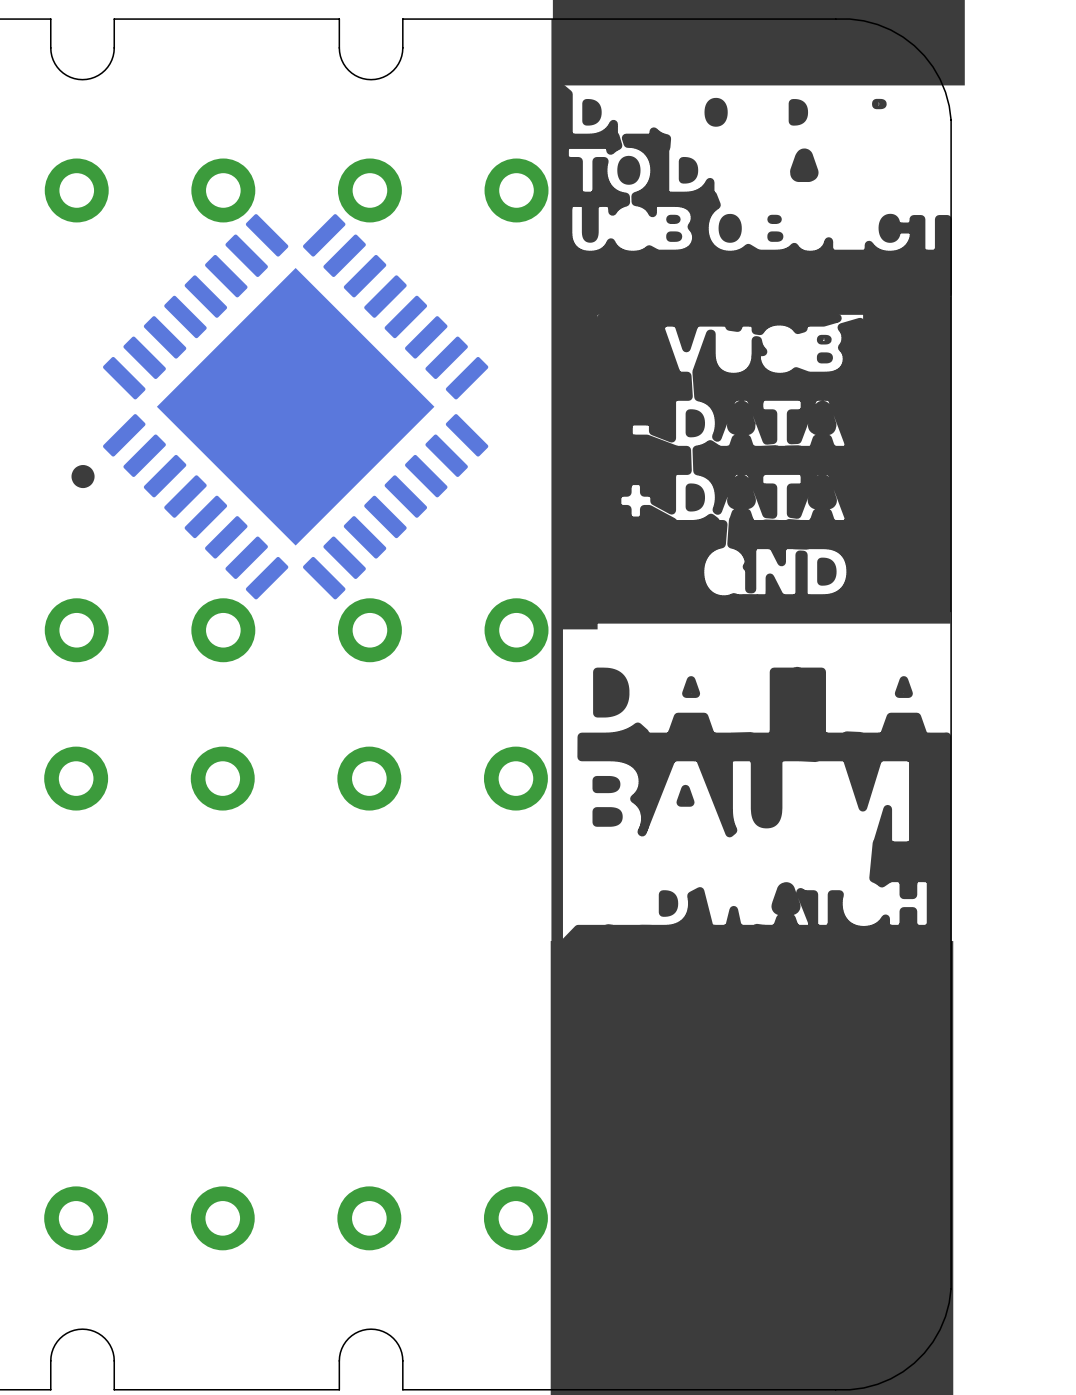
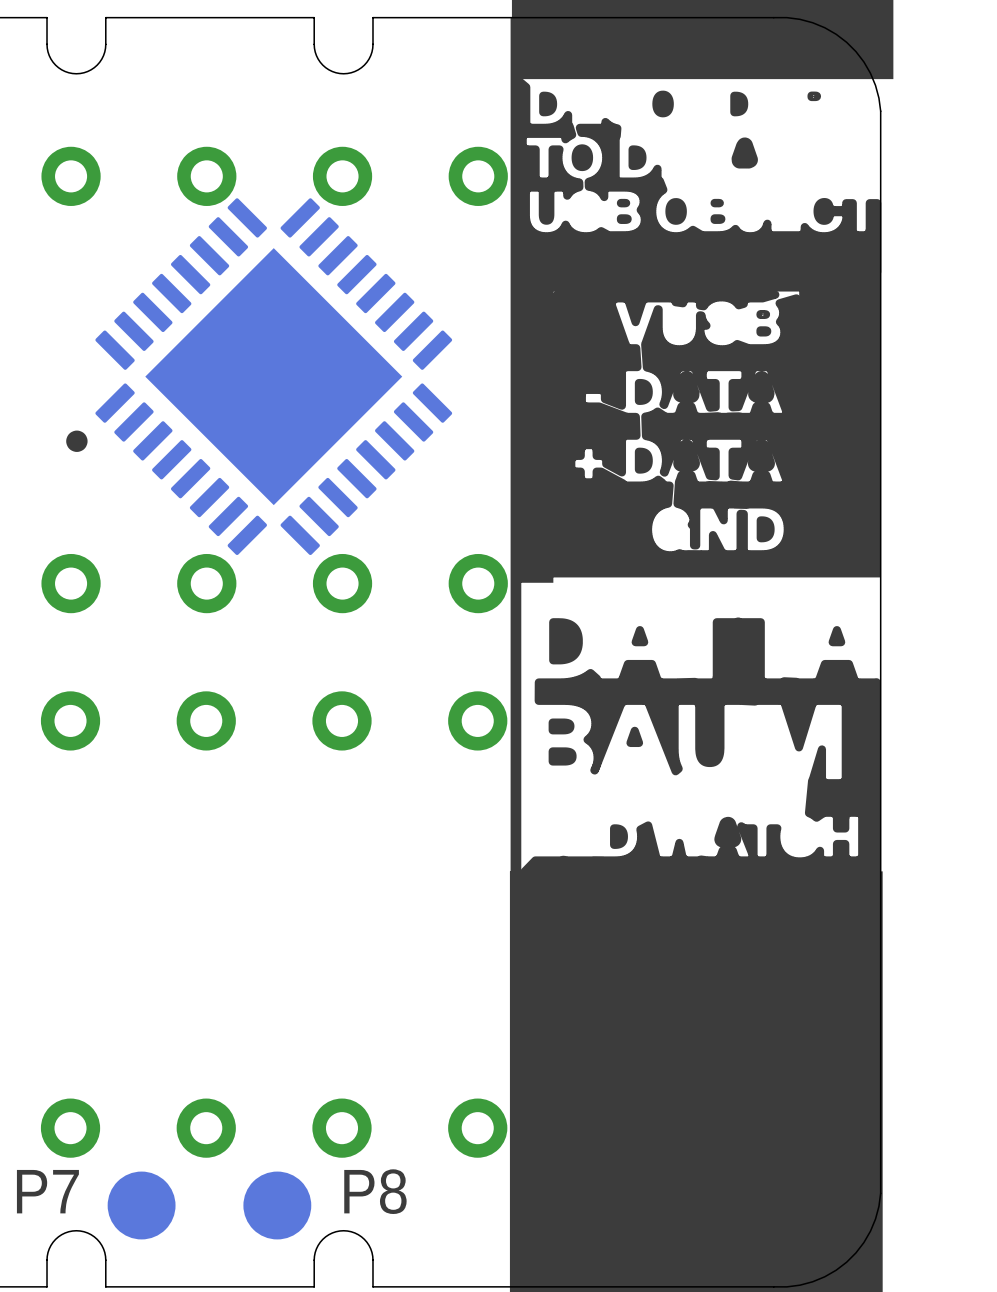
text: none -> P7 (47, 1191)
text: none -> P8 (375, 1191)
part: none -> (141, 1205)
part: none -> (277, 1205)

